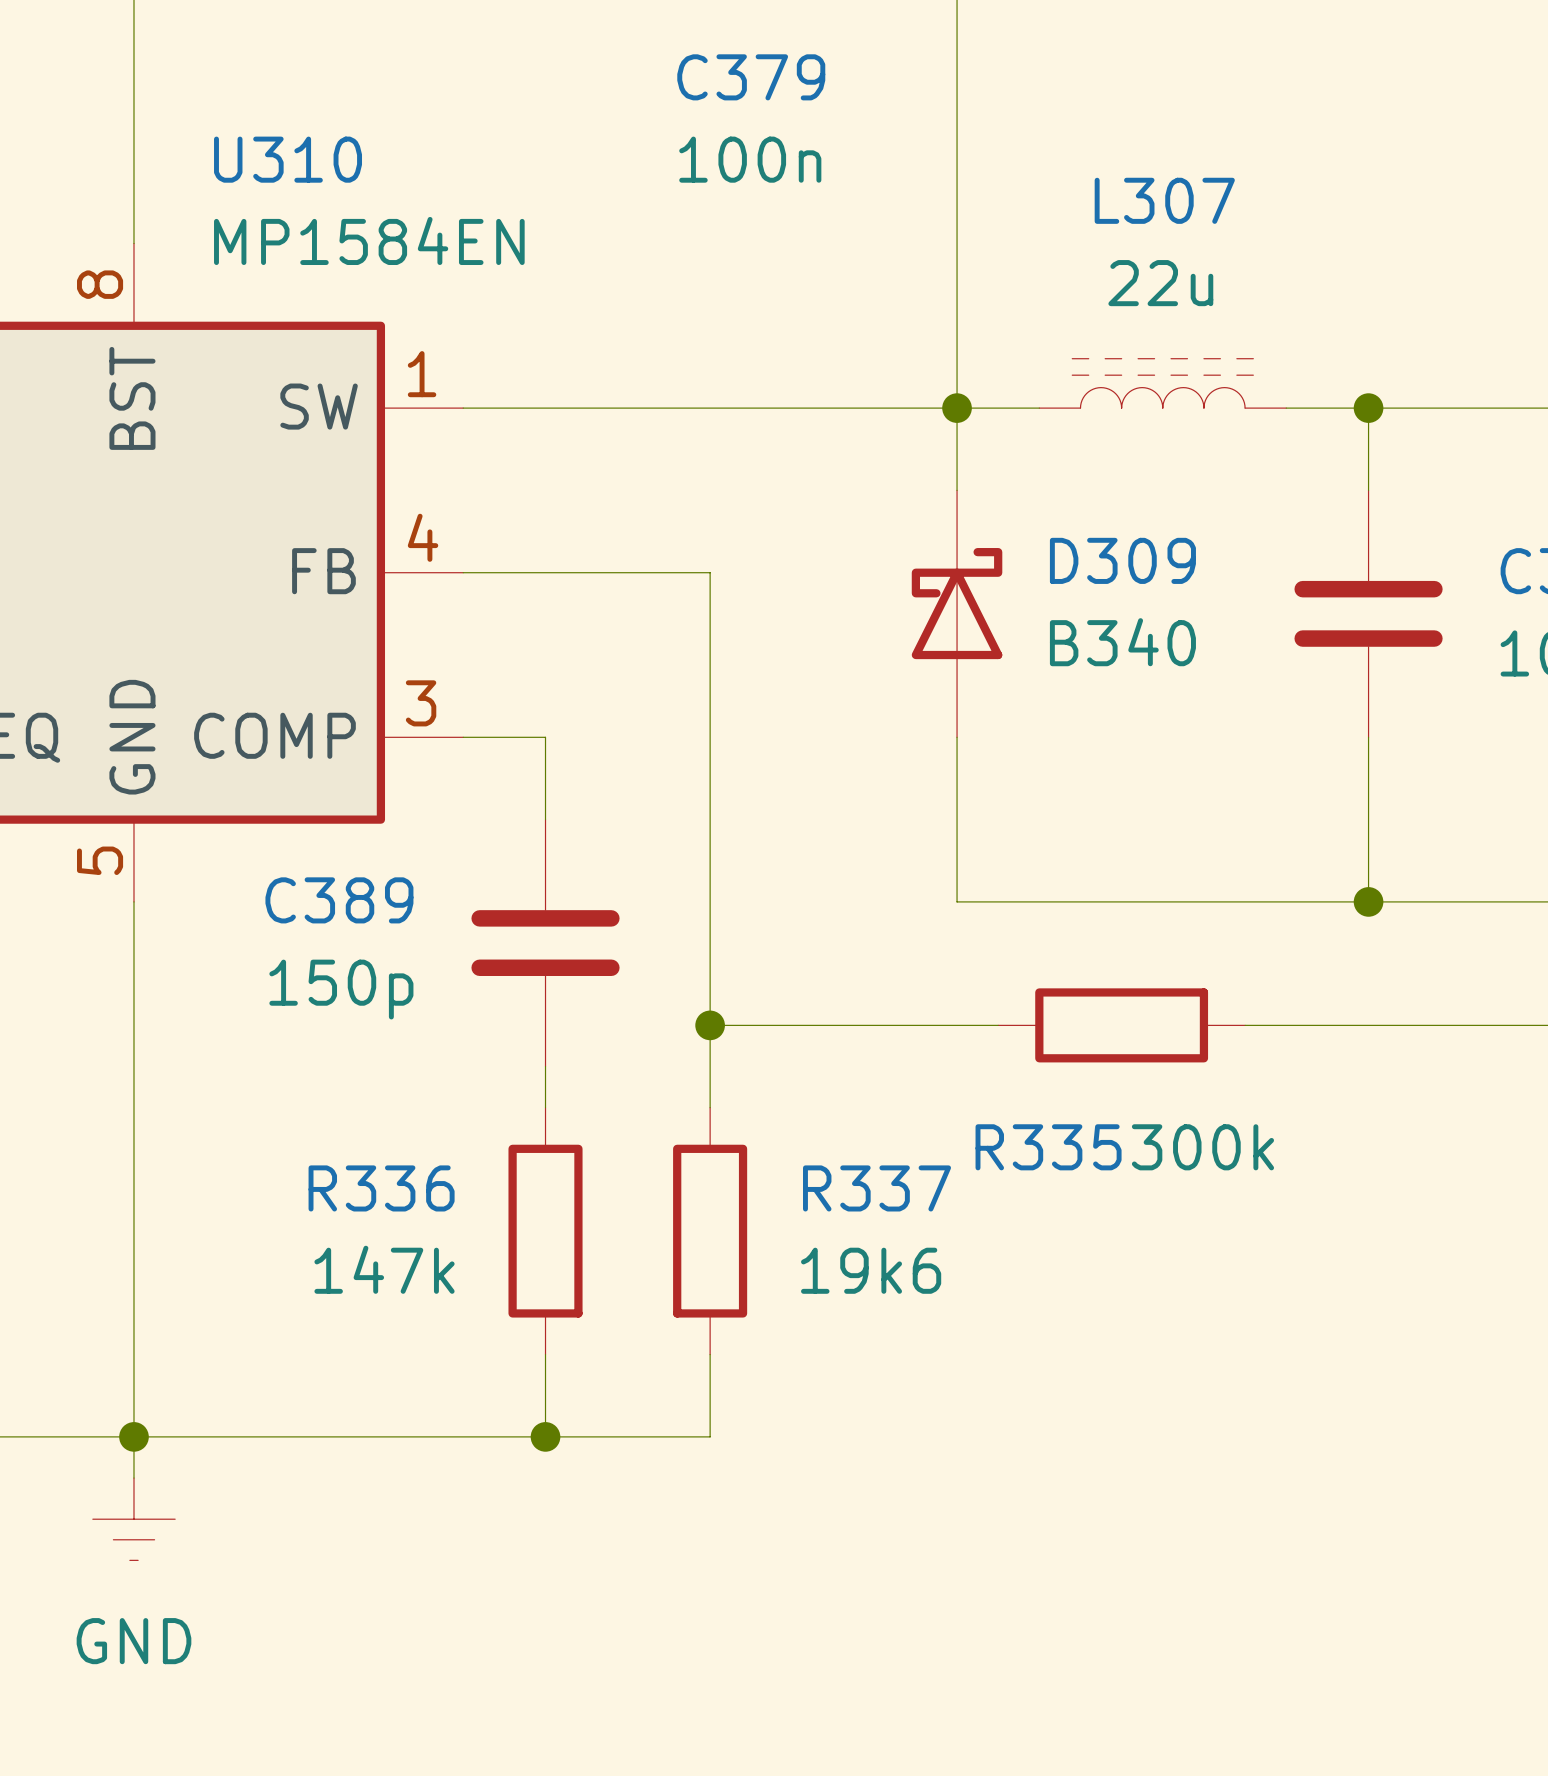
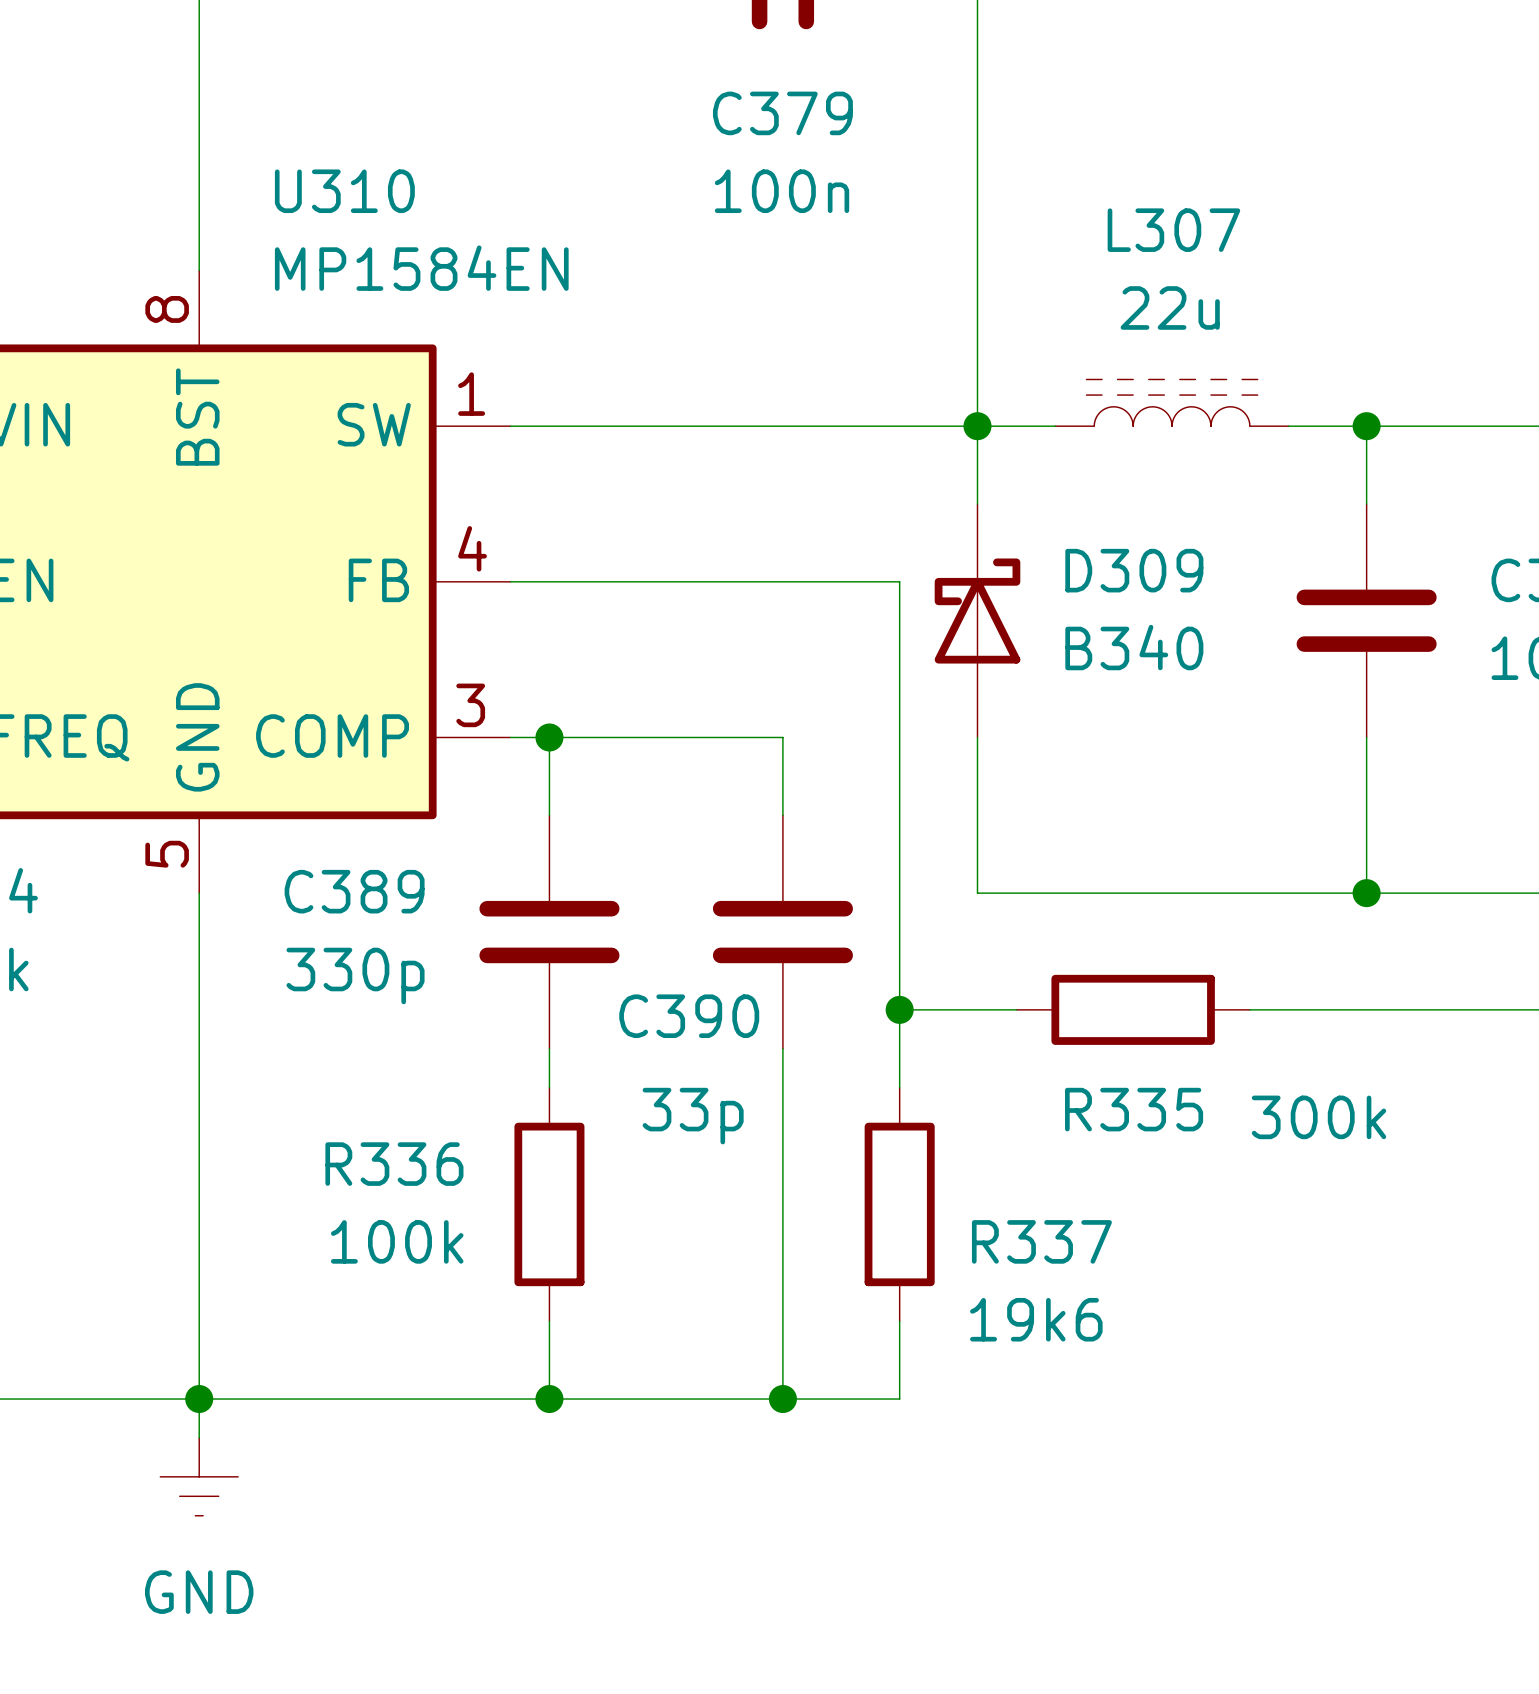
wire: (710, 572) (710, 1107) -> (744, 581) (899, 581) (899, 1087)
wire: none -> (549, 737) (549, 815)
junction: none -> (549, 737)
wire: (545, 737) (545, 819) -> (588, 737) (782, 737) (782, 815)
C389 position: (545, 943) -> (549, 932)
C390: none -> 33p (782, 932)
C389 value: 150p (341, 989) -> 330p (355, 975)
wire: (710, 1025) (874, 1025) -> none
junction position: (710, 1025) -> (899, 1009)
wire: (545, 1066) (545, 1107) -> (549, 1048) (549, 1087)
wire: none -> (782, 1048) (782, 1399)
R335 name position: R335 (1048, 1147) -> R335 (1134, 1109)
R335 value position: 300k (1202, 1147) -> 300k (1319, 1117)
R337 name position: R337 (876, 1188) -> R337 (1041, 1241)
R336 position: (545, 1231) -> (549, 1204)
R337 position: (710, 1231) -> (899, 1204)
R336 value: 147k (384, 1269) -> 100k (397, 1241)
R337 value position: 19k6 (871, 1270) -> 19k6 (1036, 1319)
wire: (545, 1354) (545, 1436) -> (549, 1321) (549, 1399)
wire: (710, 1354) (710, 1436) -> (899, 1321) (899, 1399) (744, 1399)
junction position: (545, 1436) -> (549, 1399)
junction: none -> (782, 1399)

